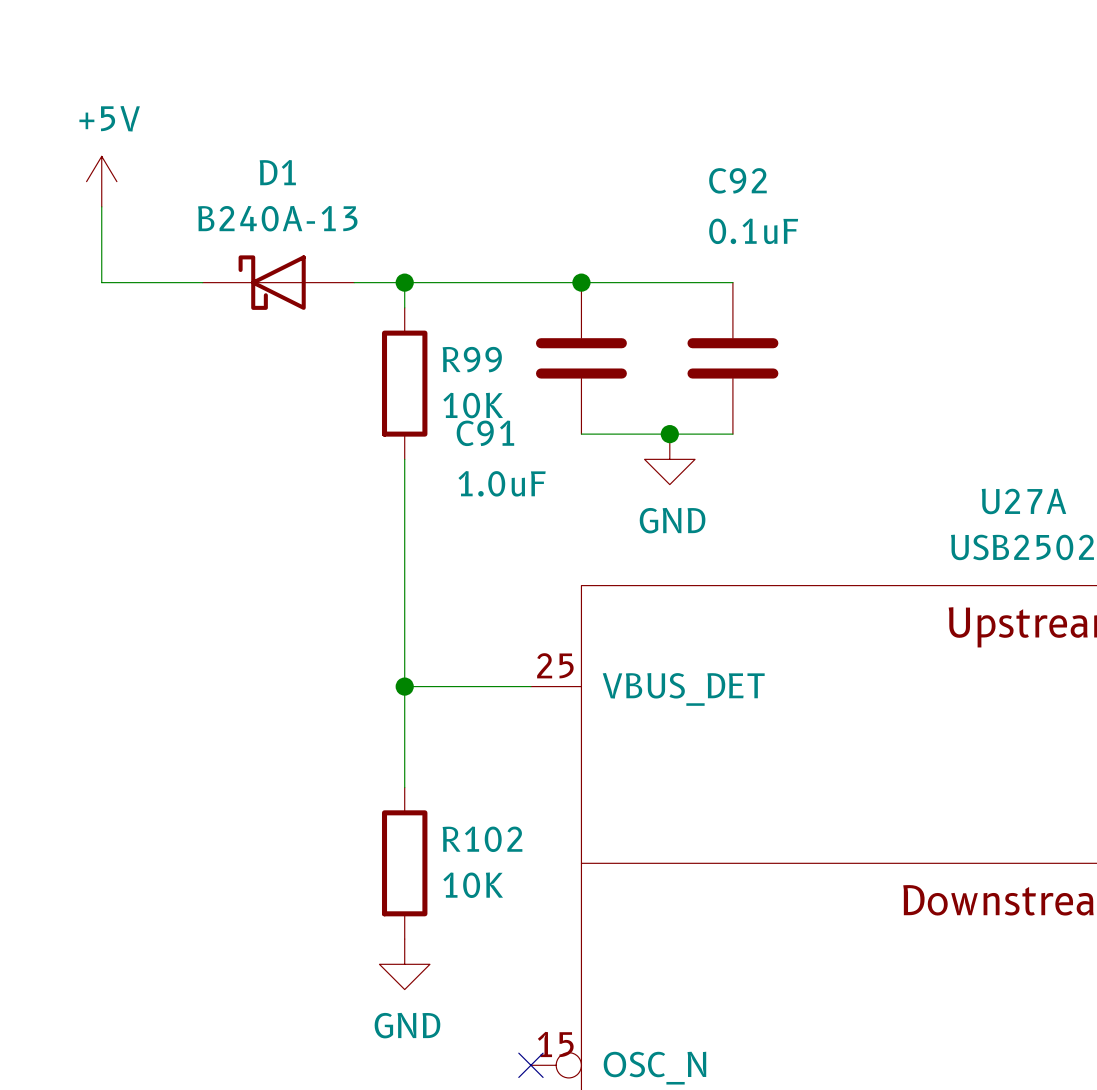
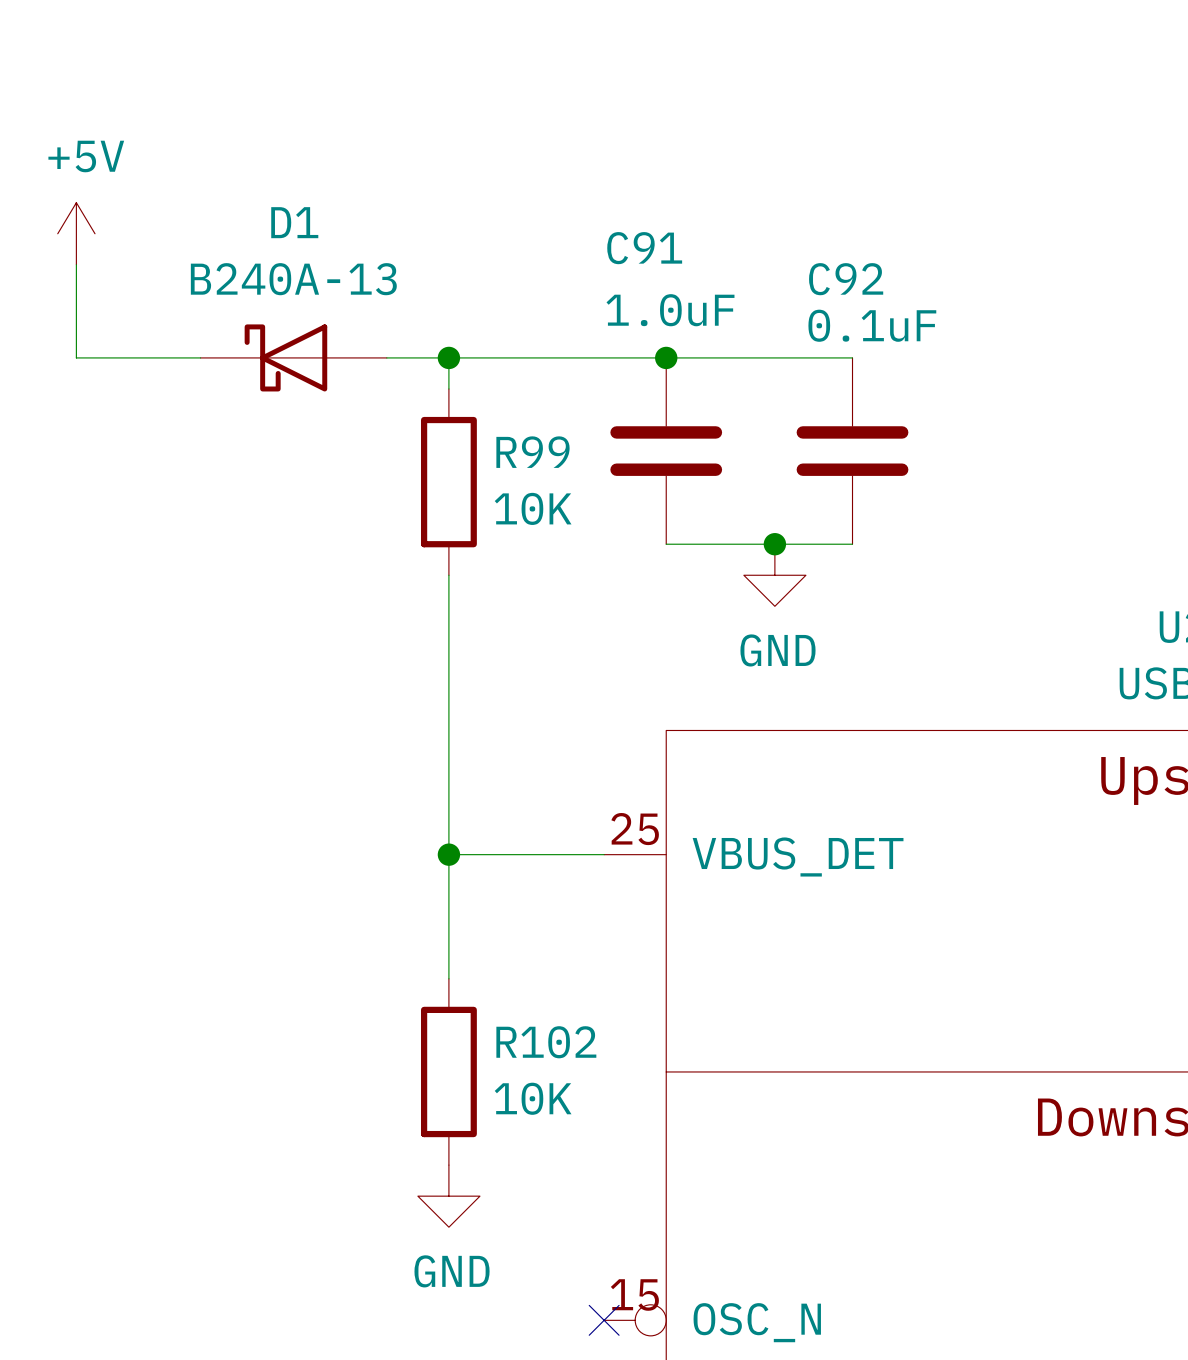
C92 name position: C92 (737, 180) -> C92 (846, 279)
C92 value position: 0.1uF (753, 231) -> 0.1uF (872, 325)
C91 name position: C91 (485, 433) -> C91 (644, 248)
C91 value position: 1.0uF (502, 483) -> 1.0uF (670, 310)

